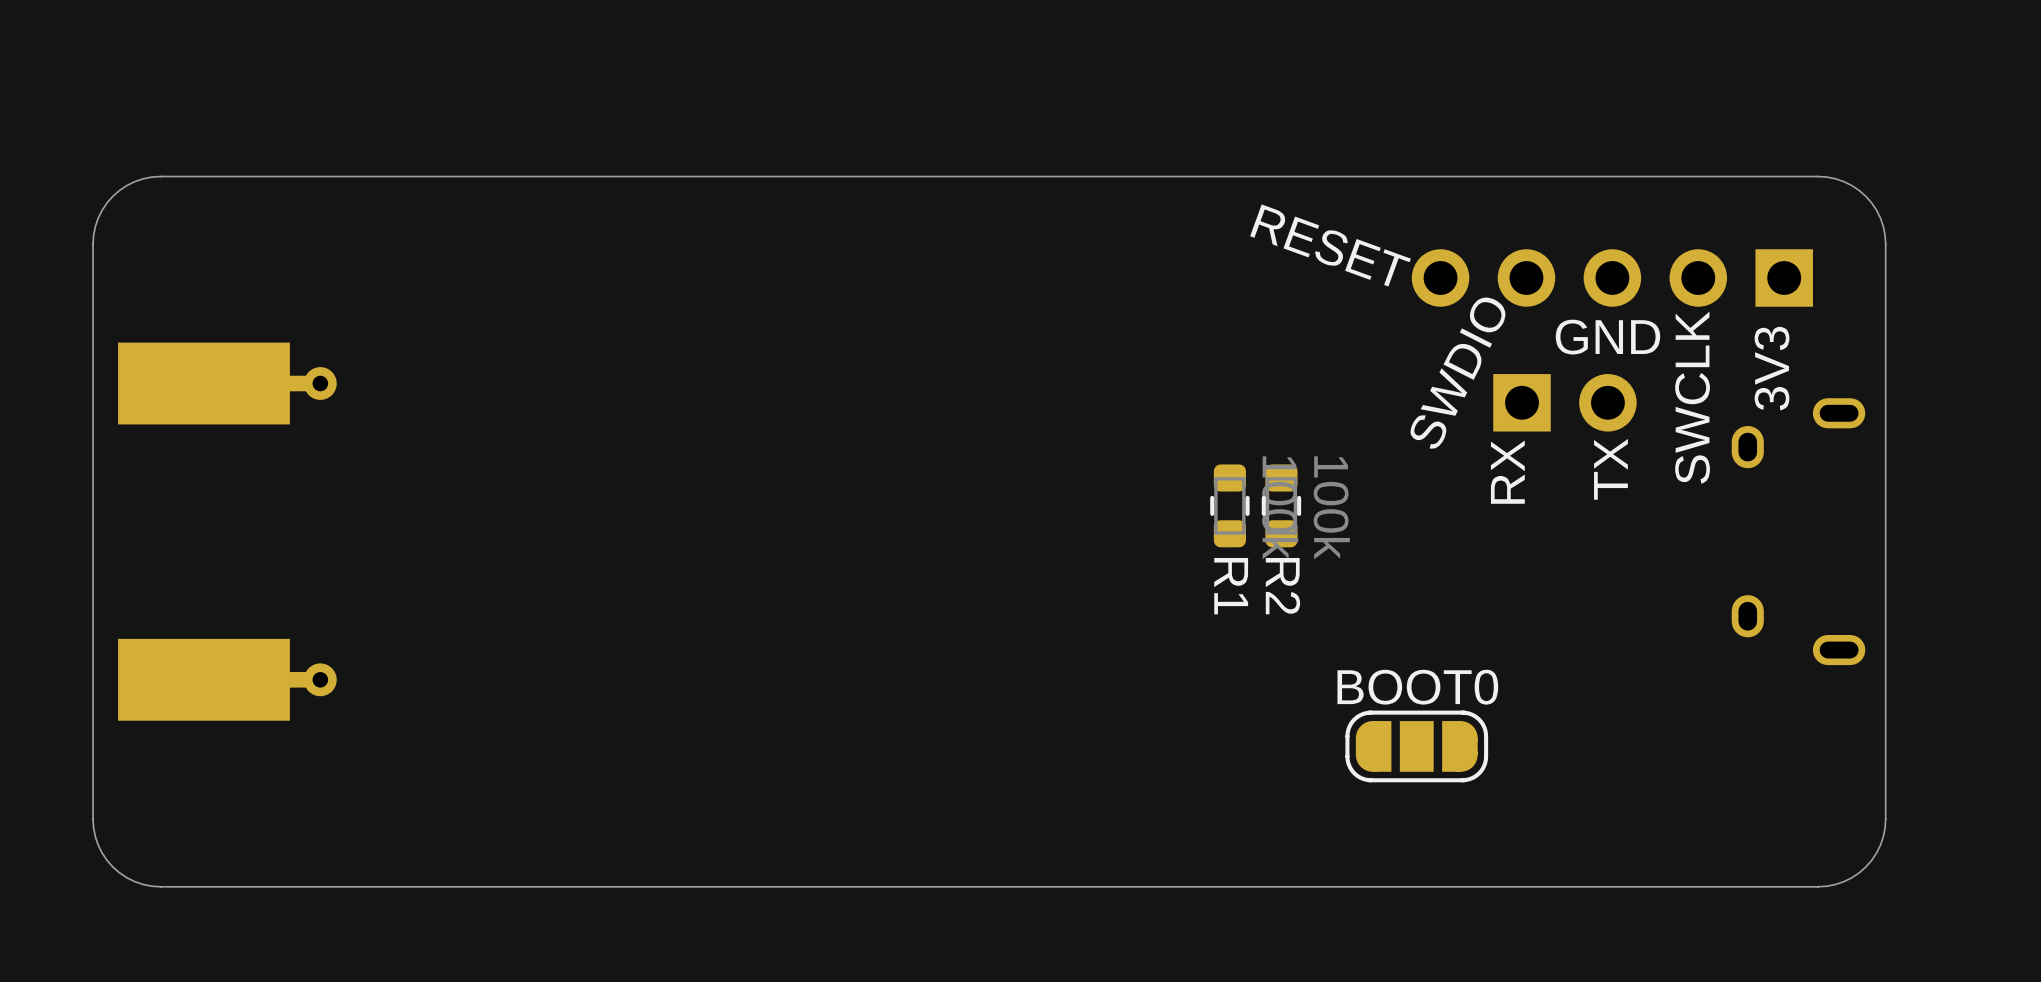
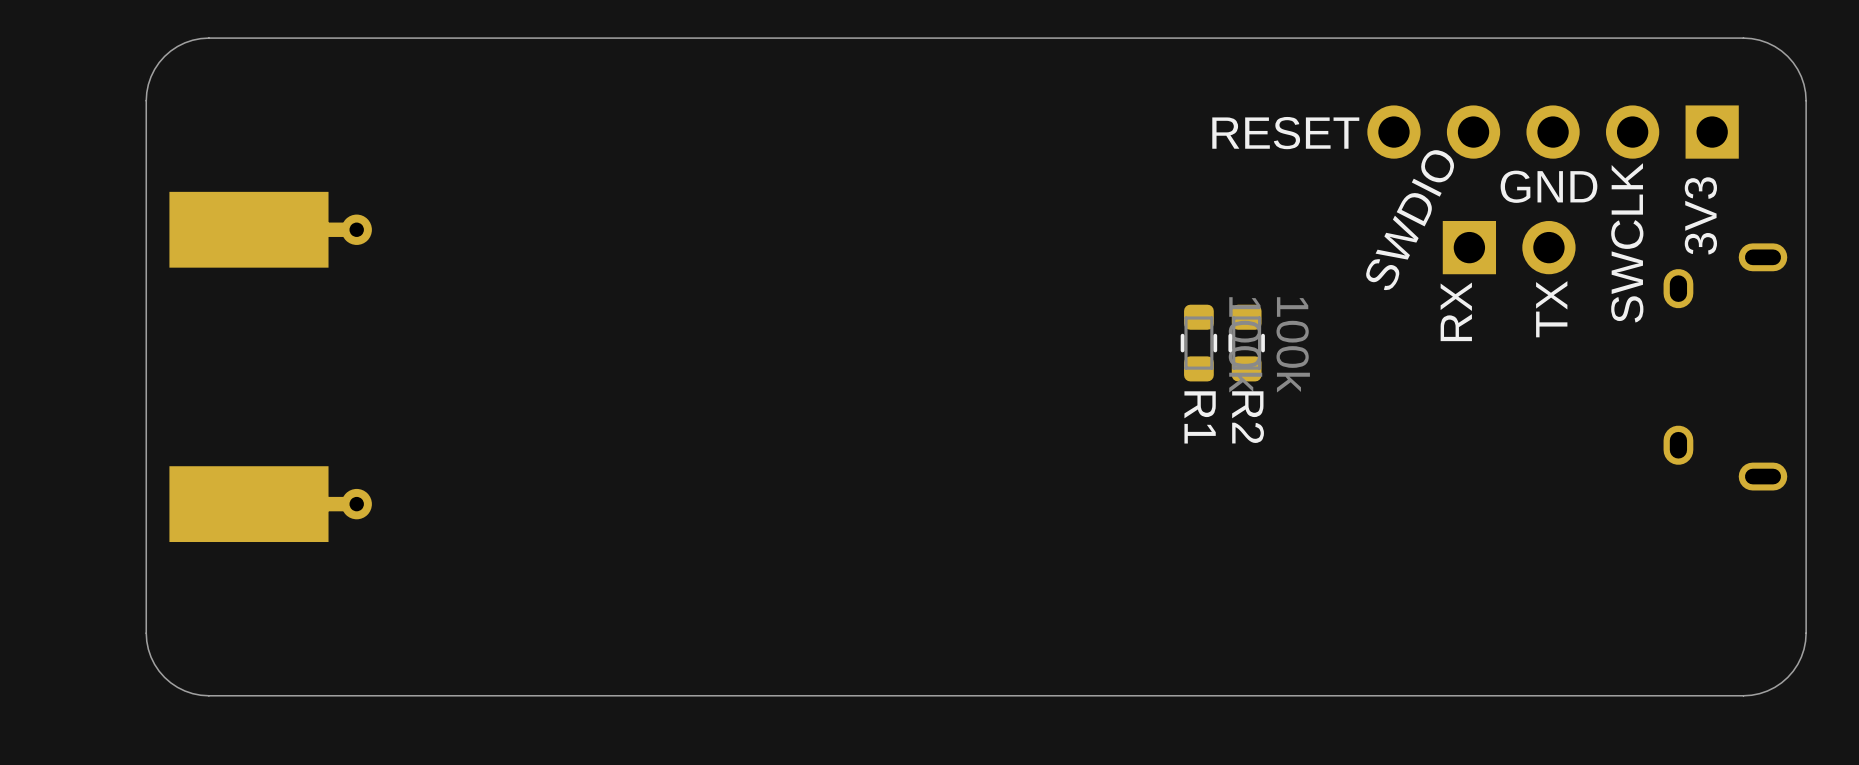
text rotation: 0° (1330, 245) -> 20° counterclockwise (1285, 133)
part: BOOT0 (1416, 746) -> none

